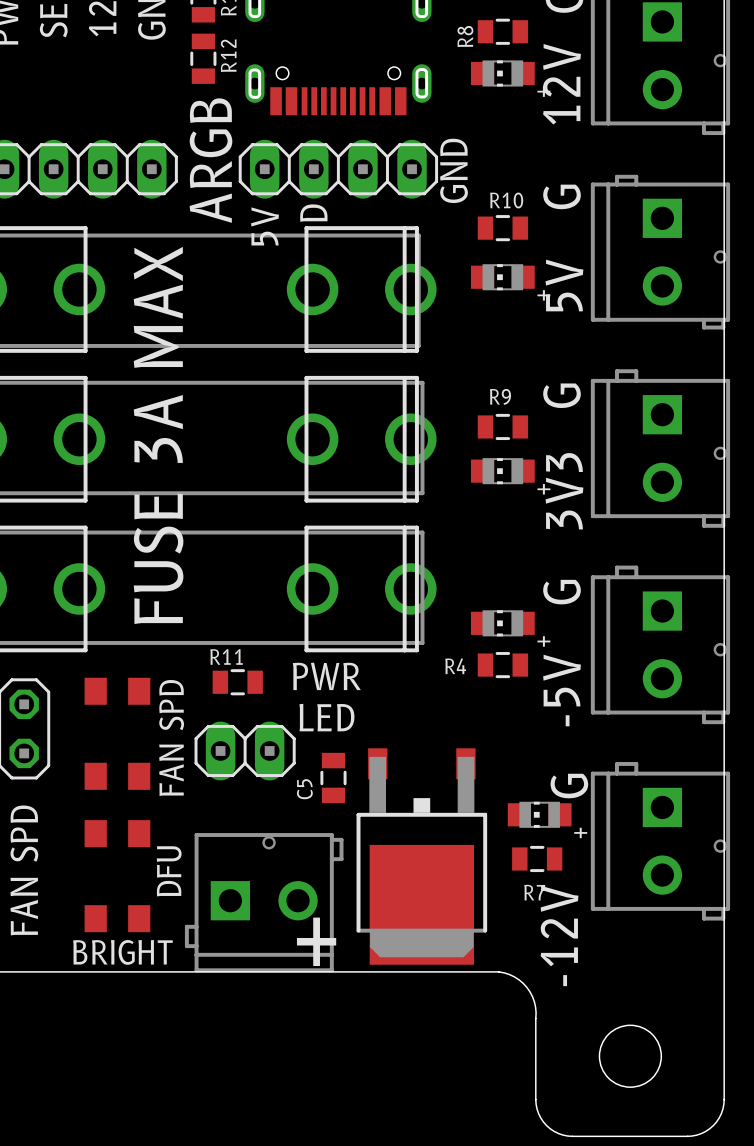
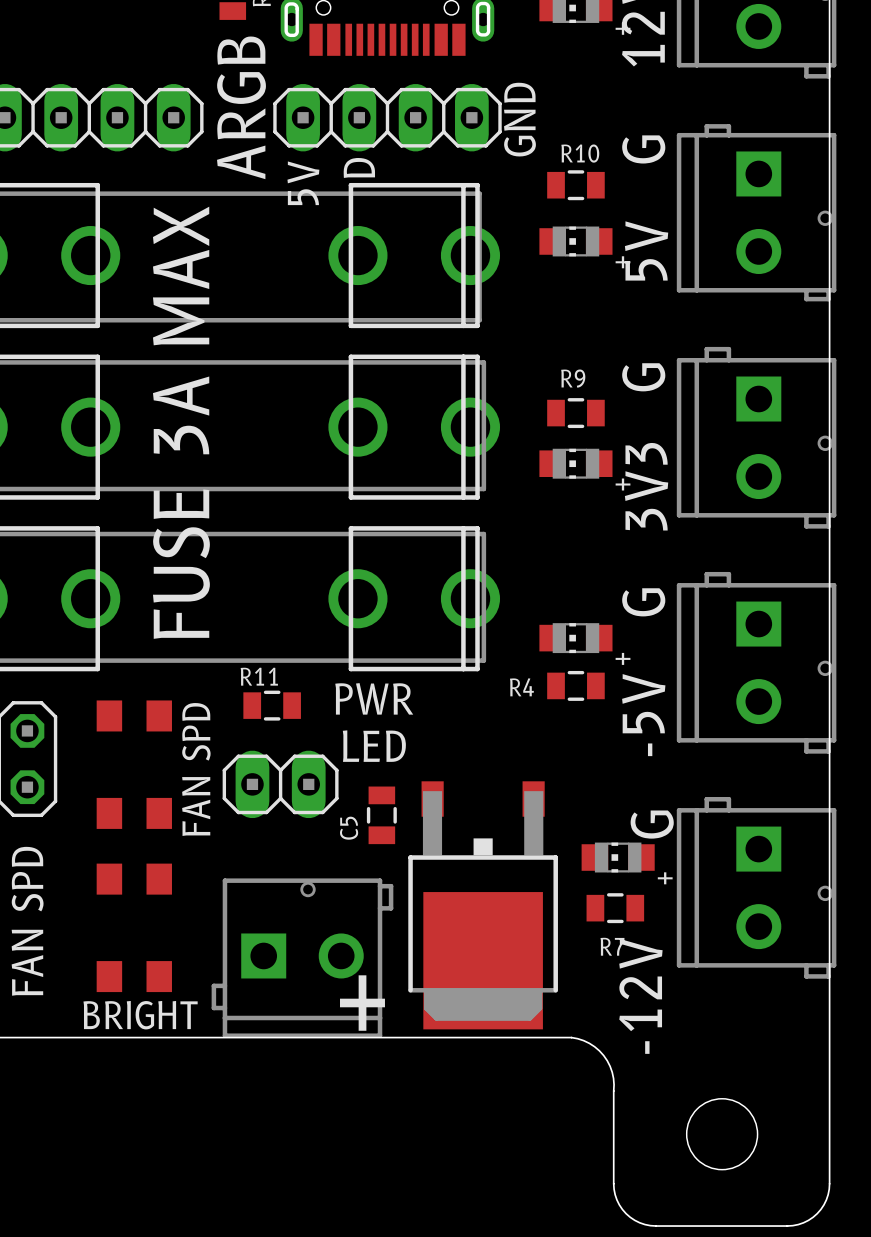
text: DFU (169, 871) -> none

